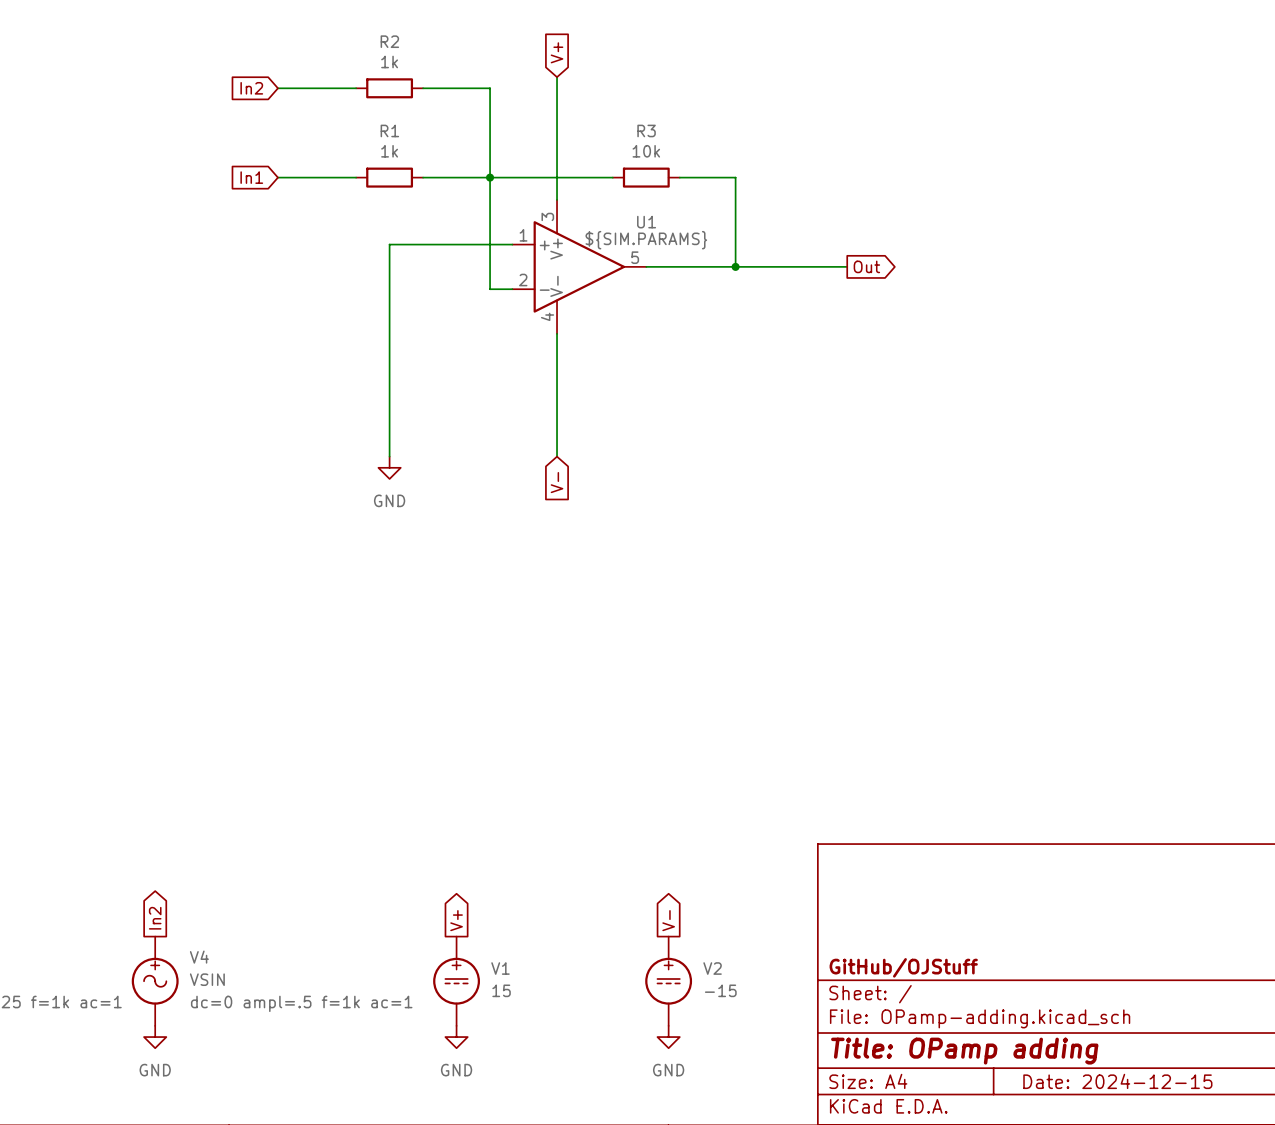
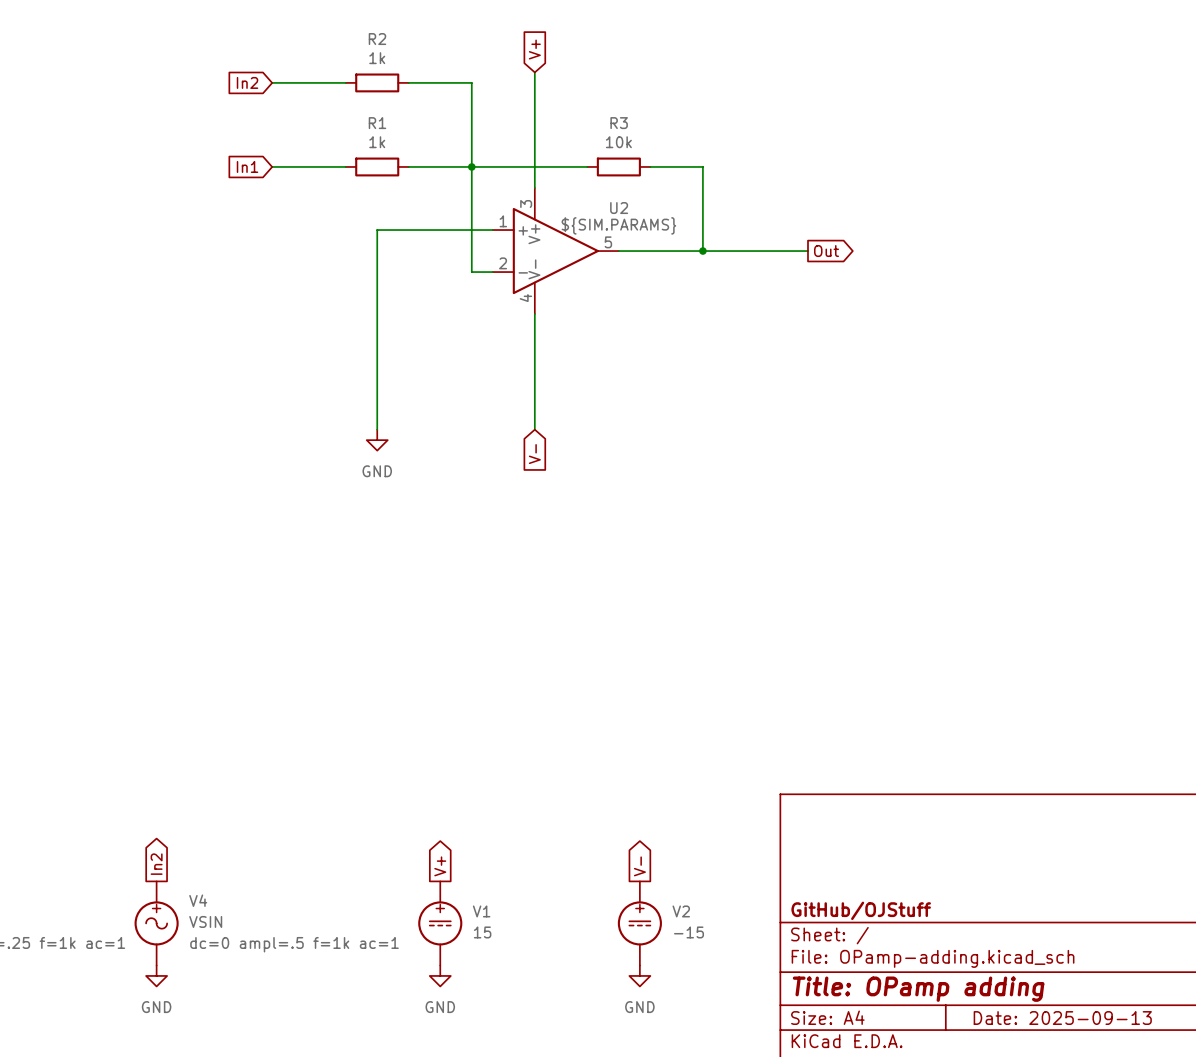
U1 name: U1 (646, 222) -> U2 (619, 208)
title block: Date: 2024-12-15 (1117, 1081) -> Date: 2025-09-13 (1062, 1018)

